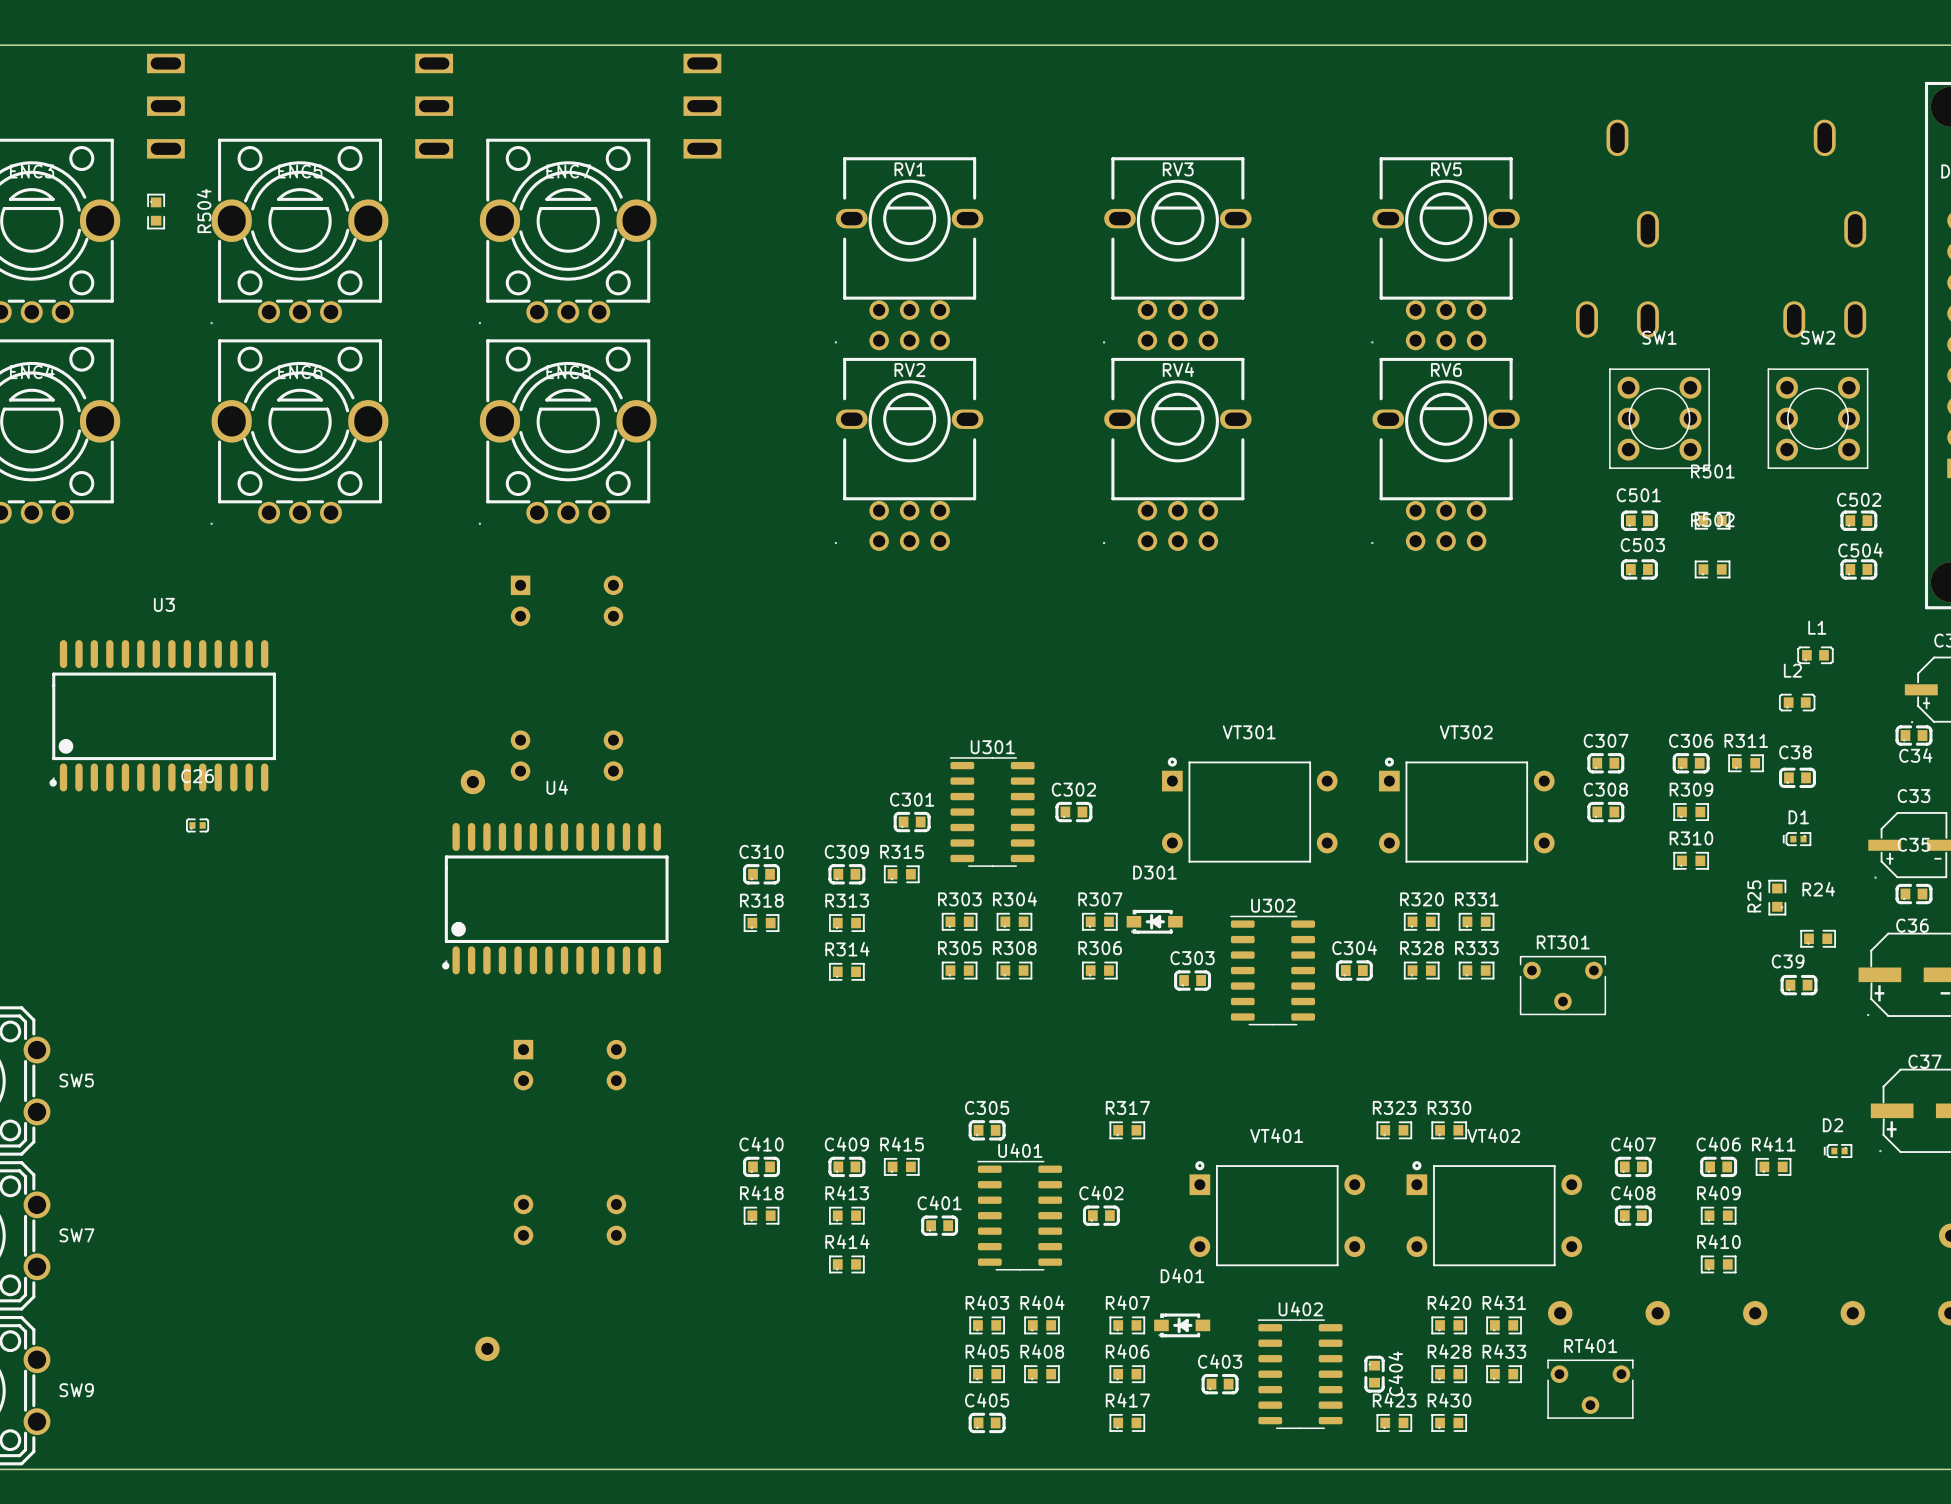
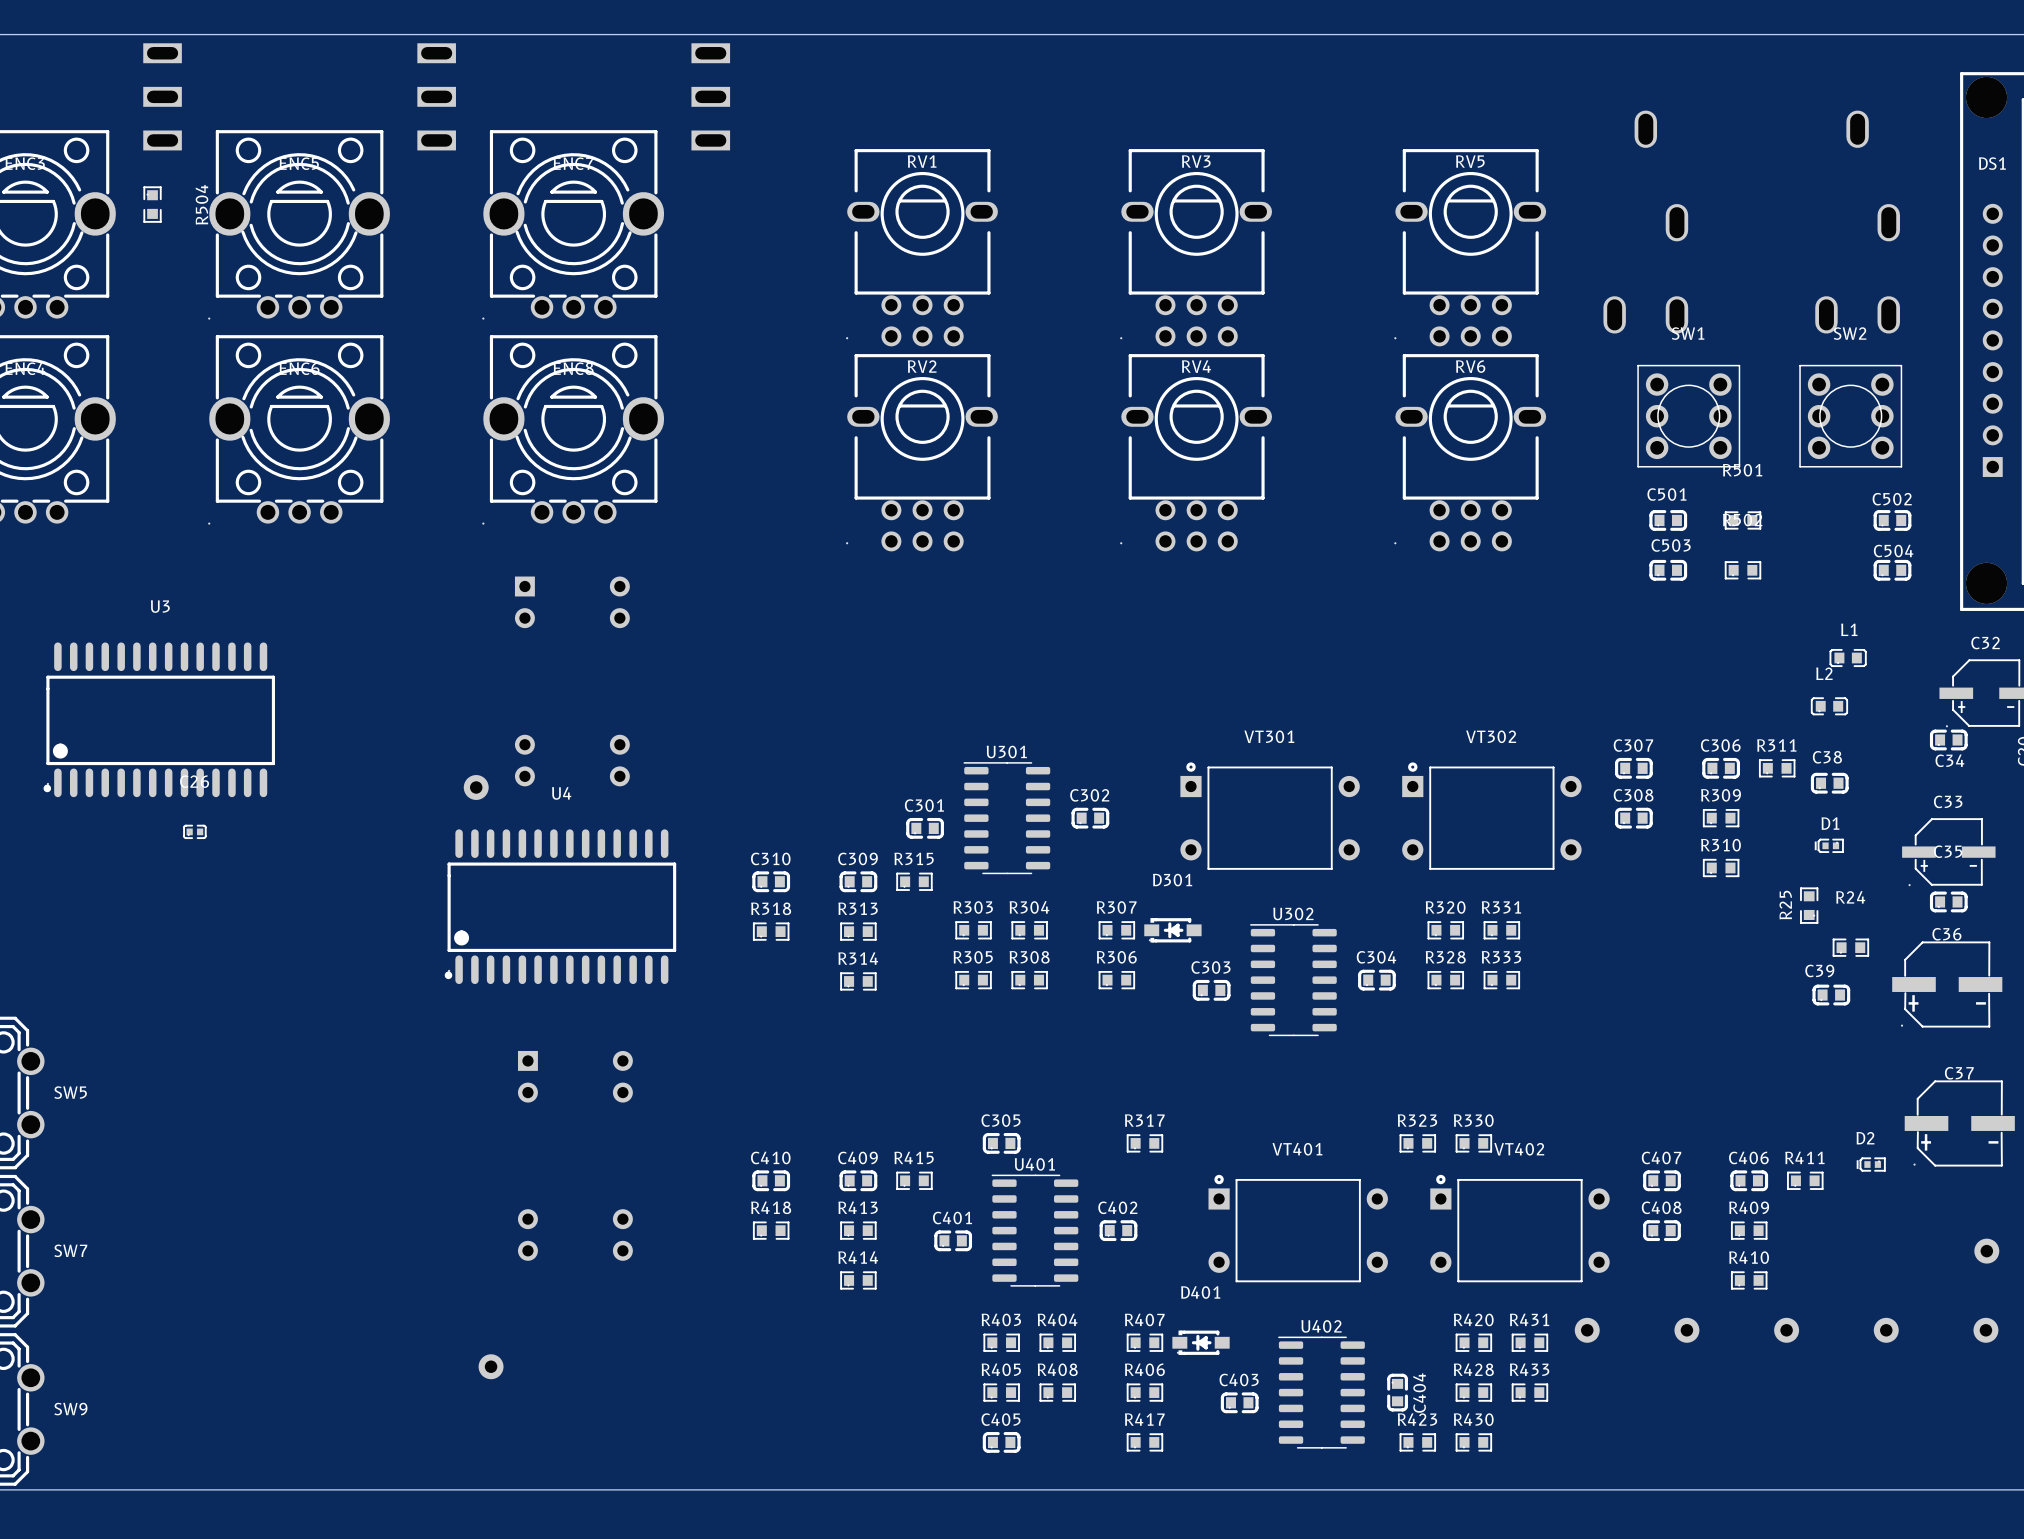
RT301: (1562, 985) -> none
RT401: (1590, 1389) -> none

